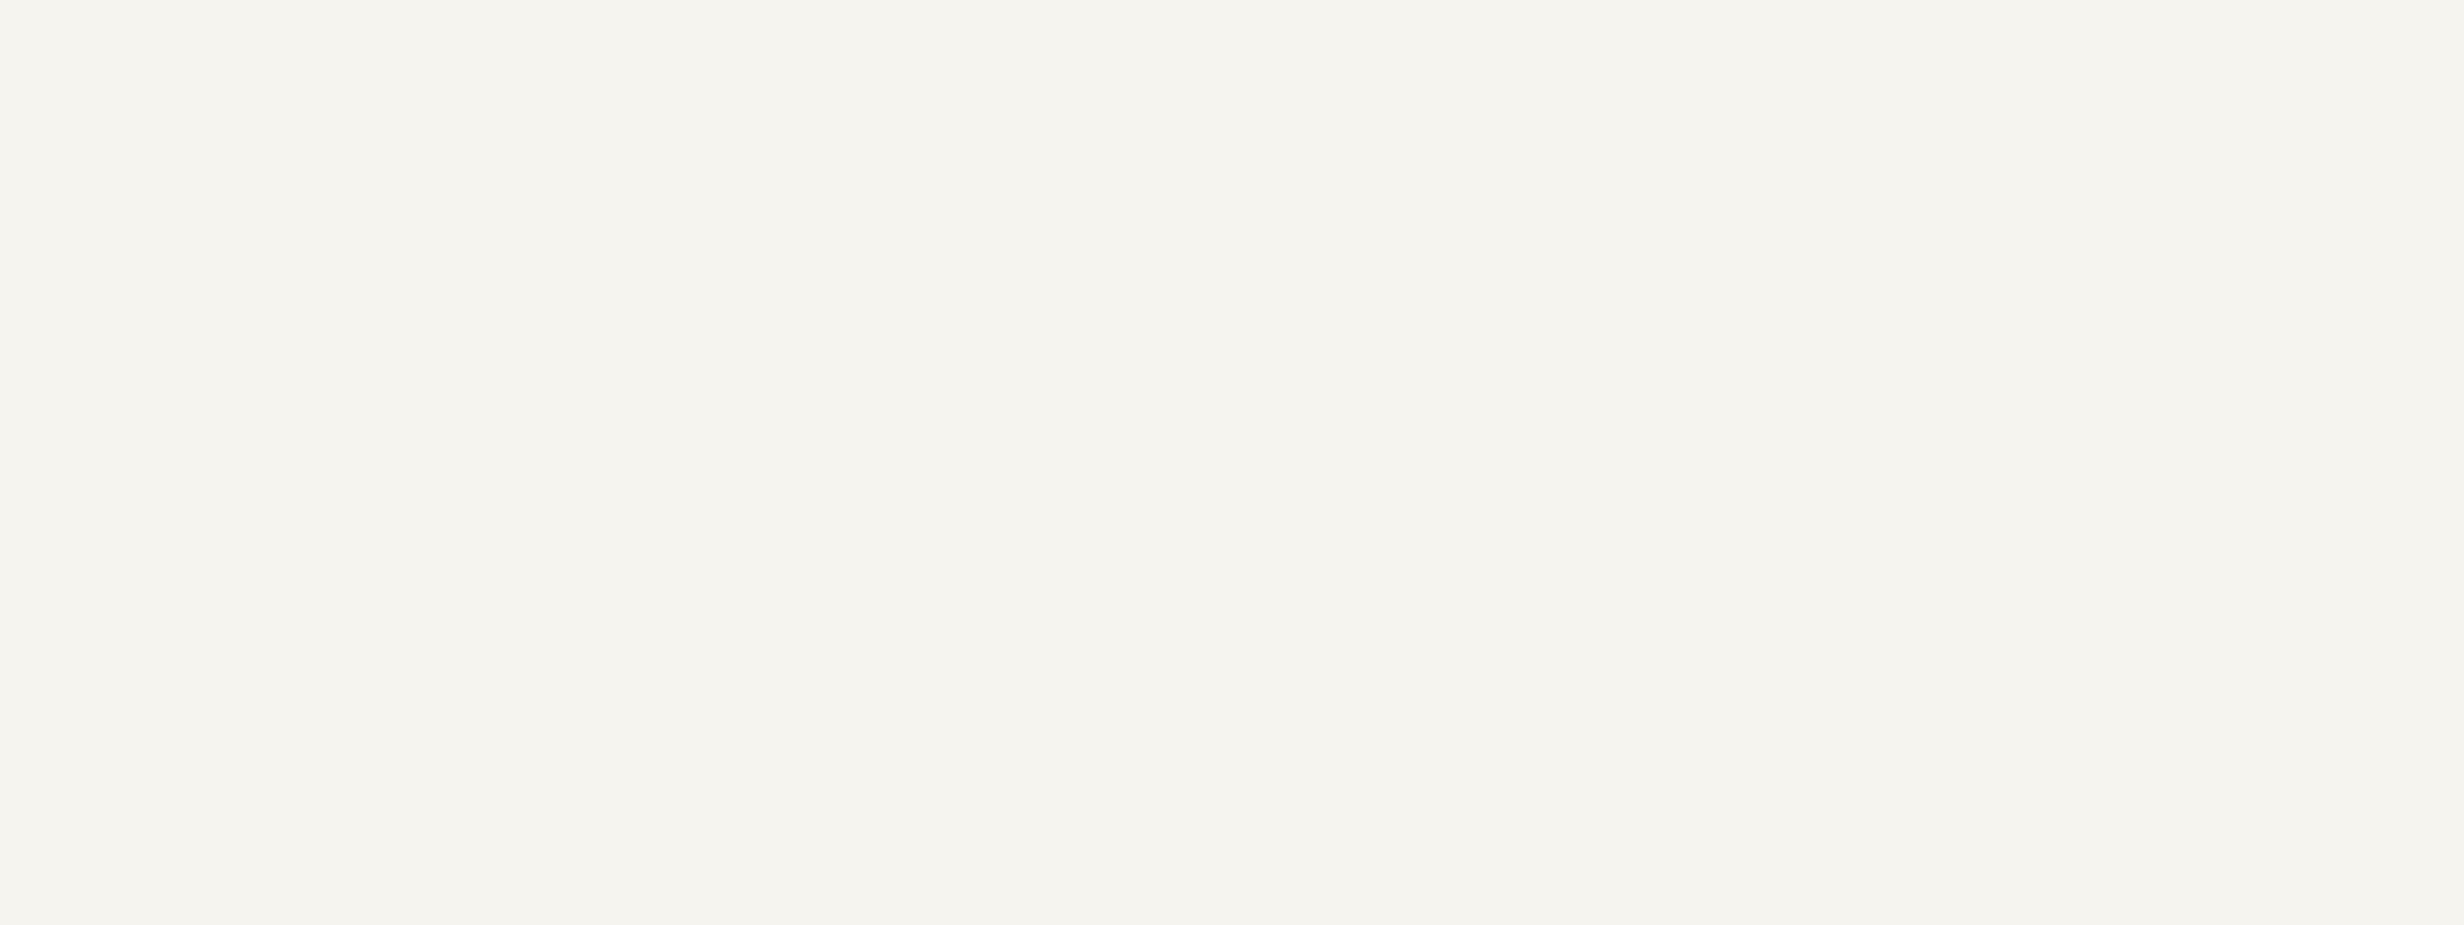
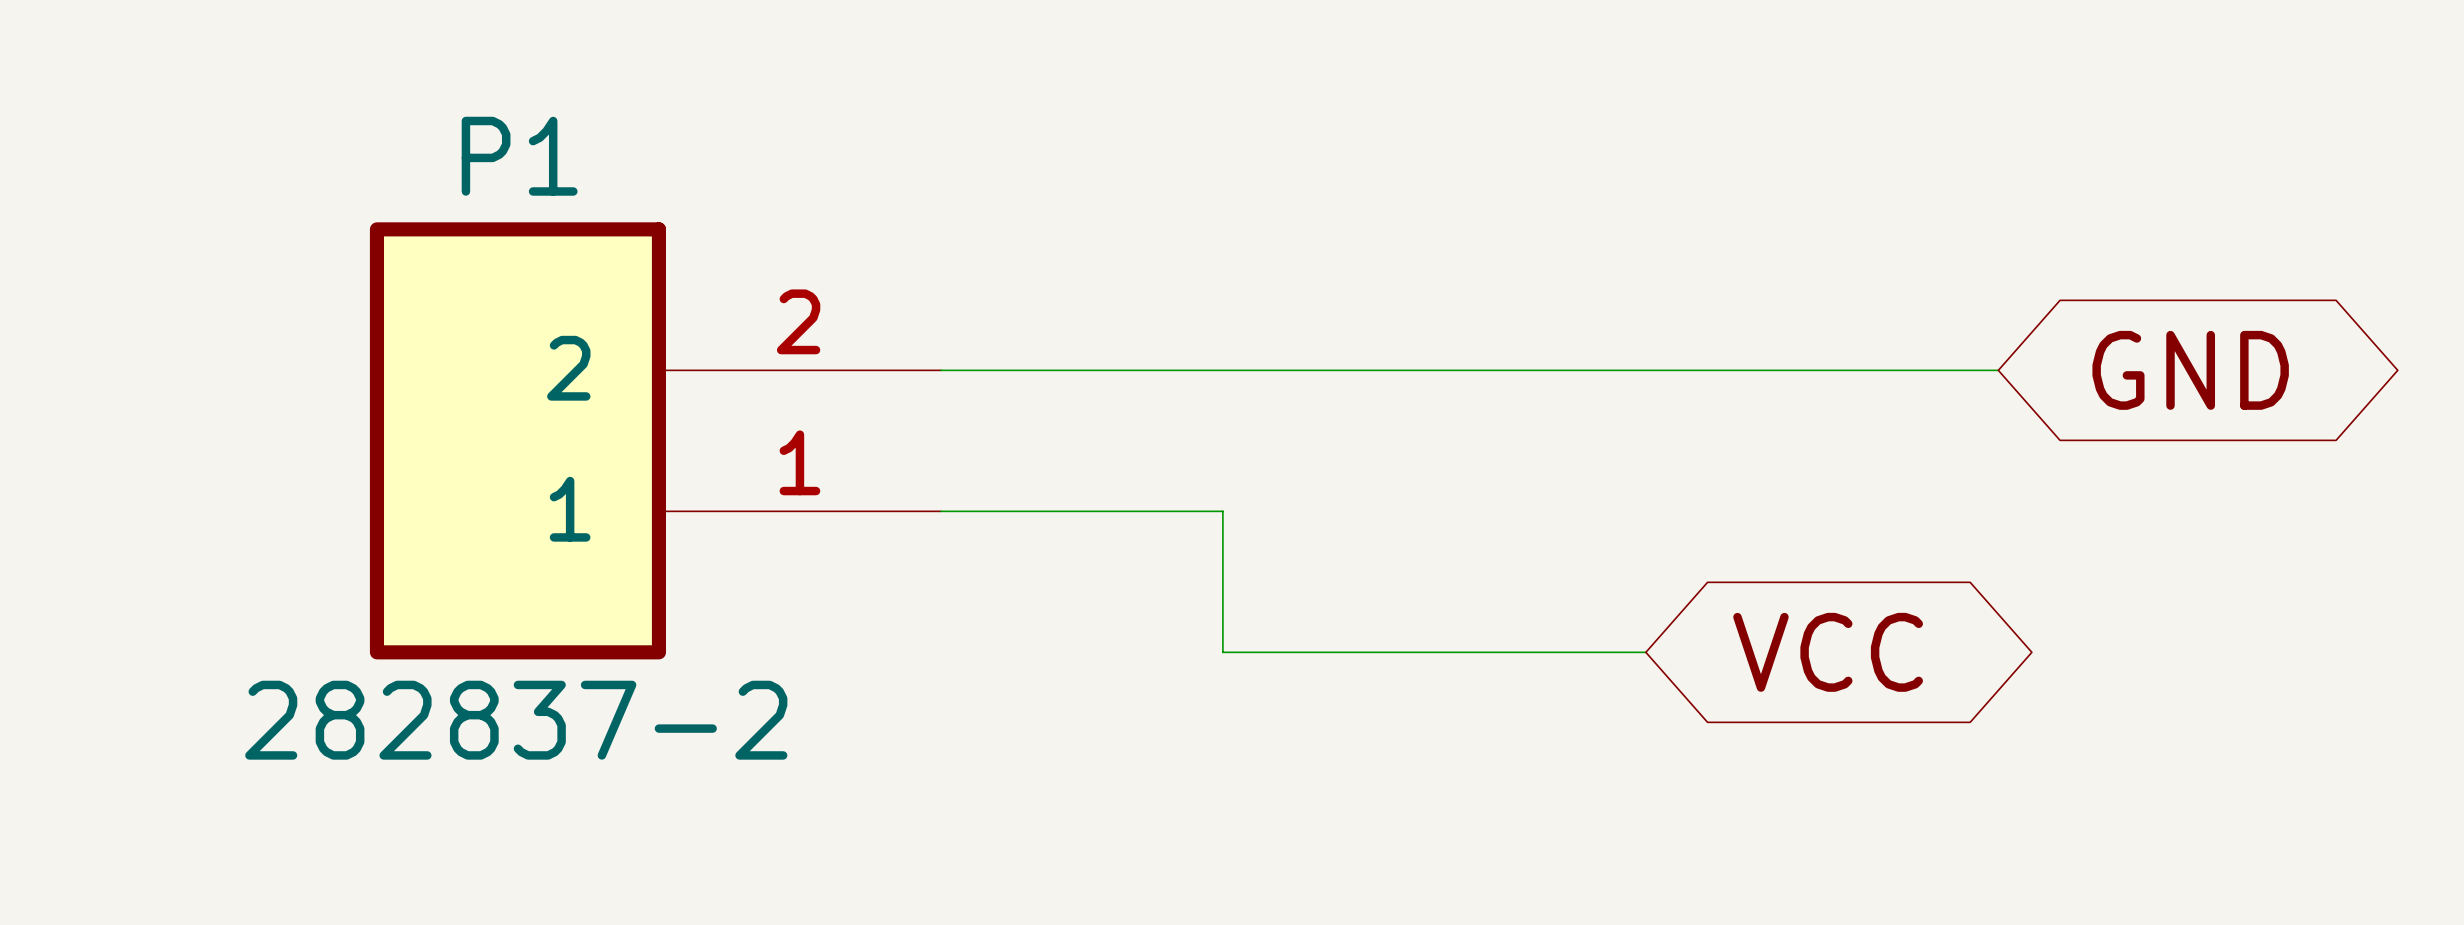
wire: none -> (940, 370) (1998, 370)
global label: none -> GND (2190, 370)
P1: none -> 282837-2 (655, 440)
wire: none -> (940, 511) (1222, 511) (1222, 652) (1645, 652)
global label: none -> VCC (1828, 652)

